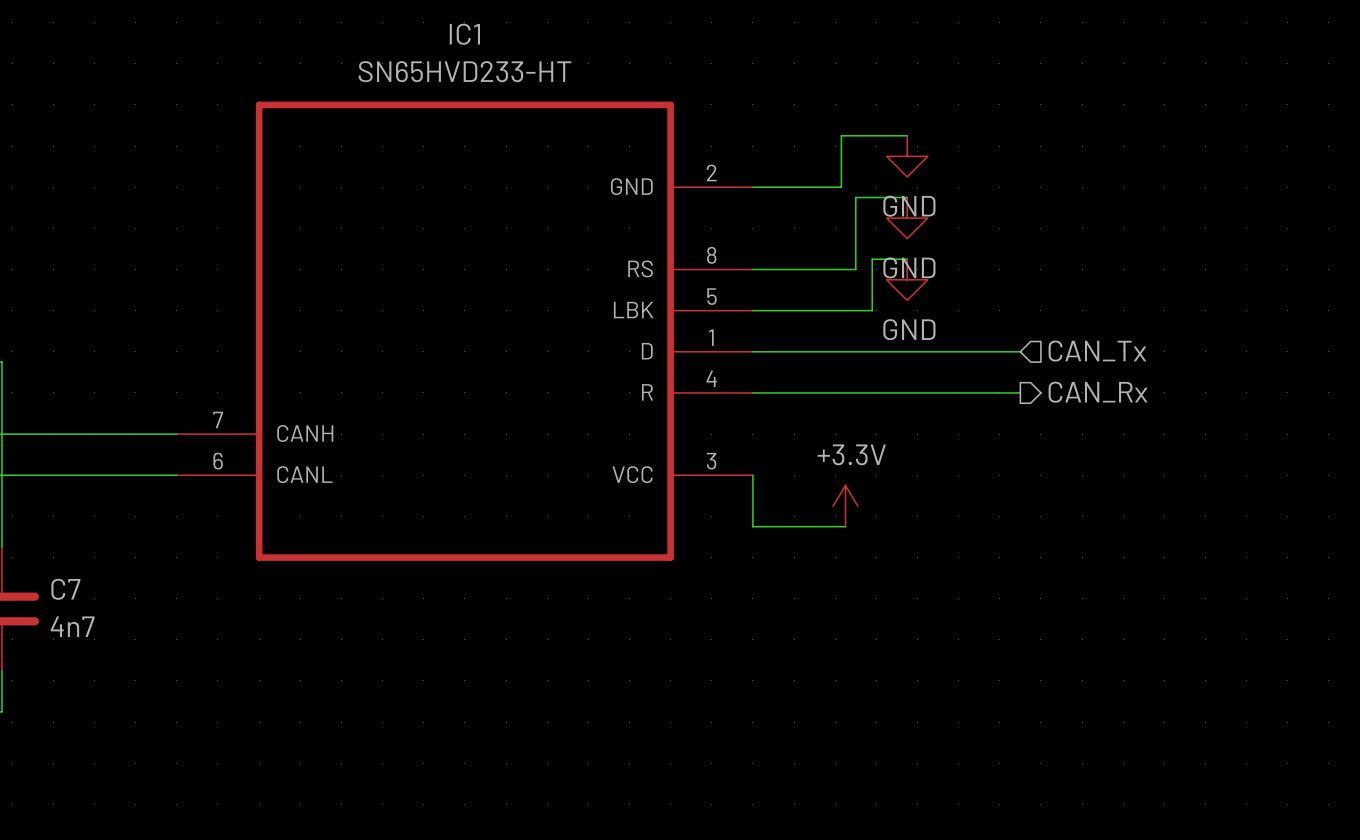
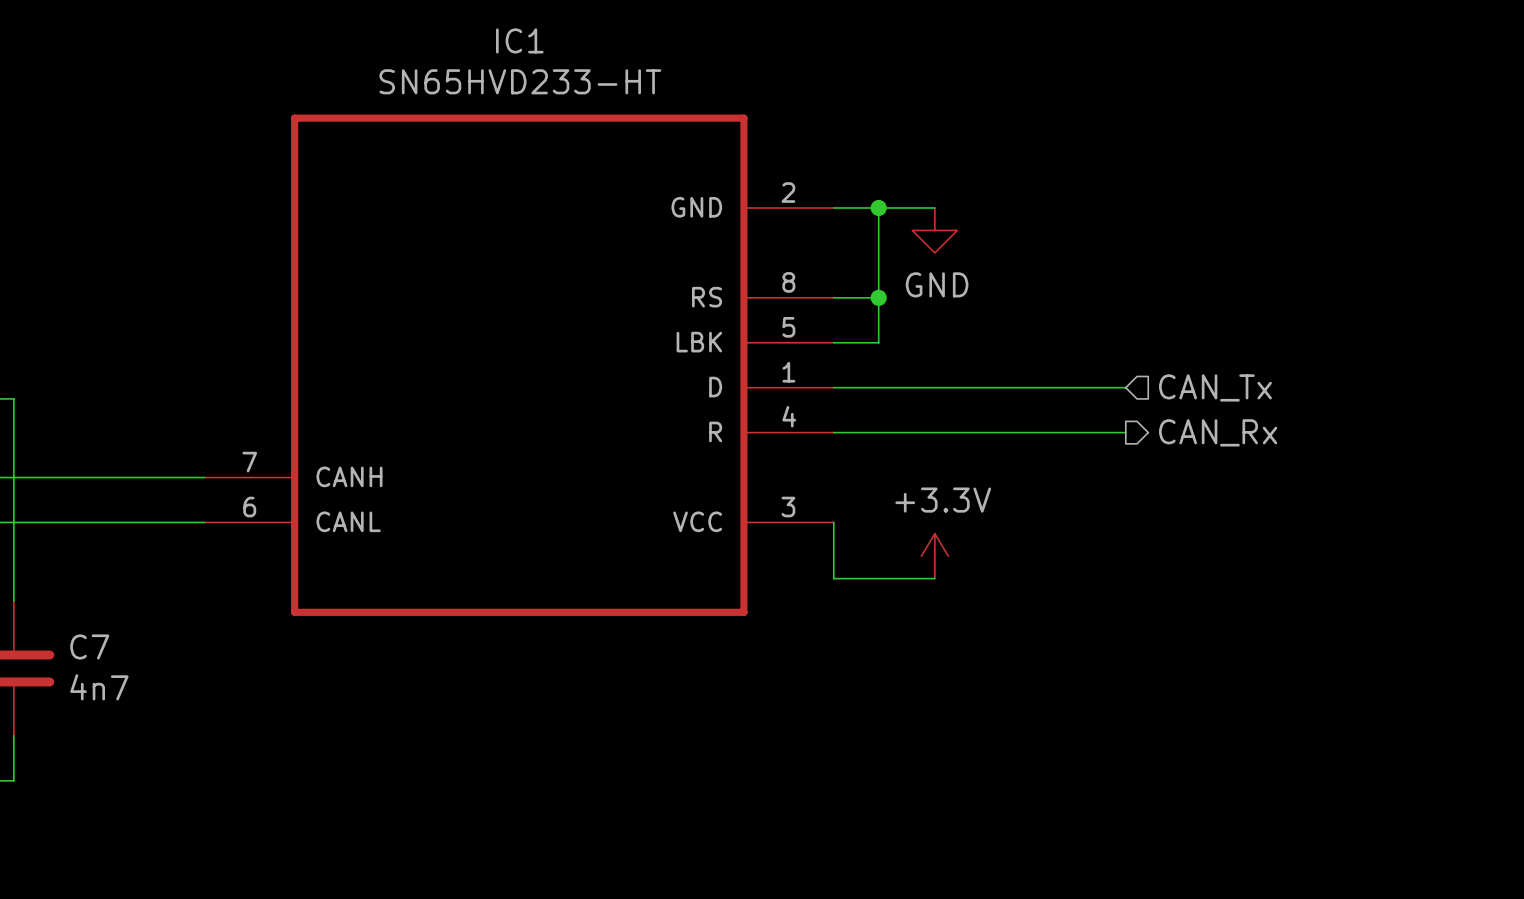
wire: (907, 135) (841, 135) (841, 187) -> (934, 207) (930, 207)
power symbol: GND (907, 156) -> none
junction: none -> (878, 207)
wire: (907, 197) (855, 197) (855, 269) (794, 269) -> none
power symbol: none -> GND (934, 230)
power symbol: GND (907, 218) -> none
wire: (907, 259) (872, 259) (872, 310) (794, 310) -> (878, 207) (878, 342)
junction: none -> (878, 297)
power symbol: GND (907, 279) -> none

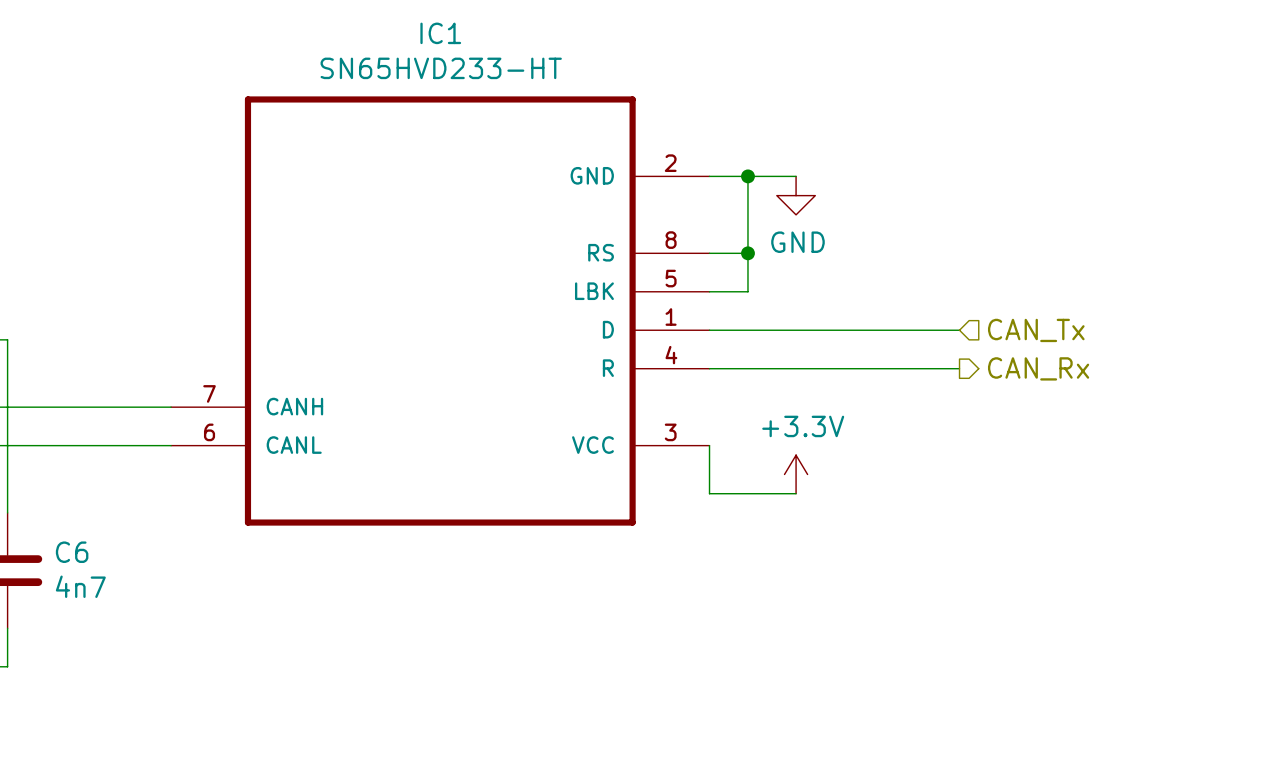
C7 name: C7 (89, 646) -> C6 (72, 552)

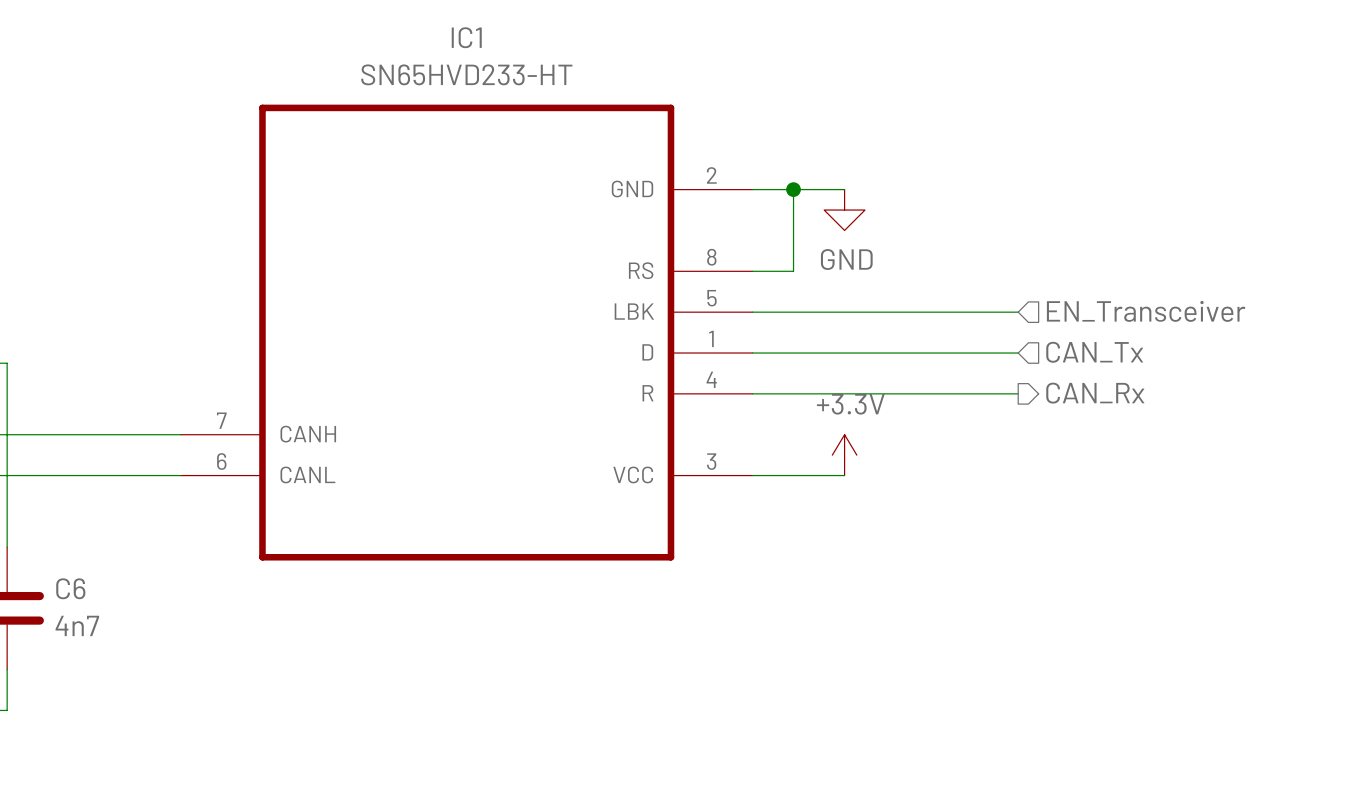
wire: (747, 253) (747, 291) -> (1018, 312) (793, 312)
junction: (747, 253) -> none
hierarchical label: none -> EN_Transceiver (1146, 311)
wire: (709, 445) (709, 493) (796, 493) -> (752, 475) (844, 475)
power symbol position: +3.3V (796, 474) -> +3.3V (844, 455)

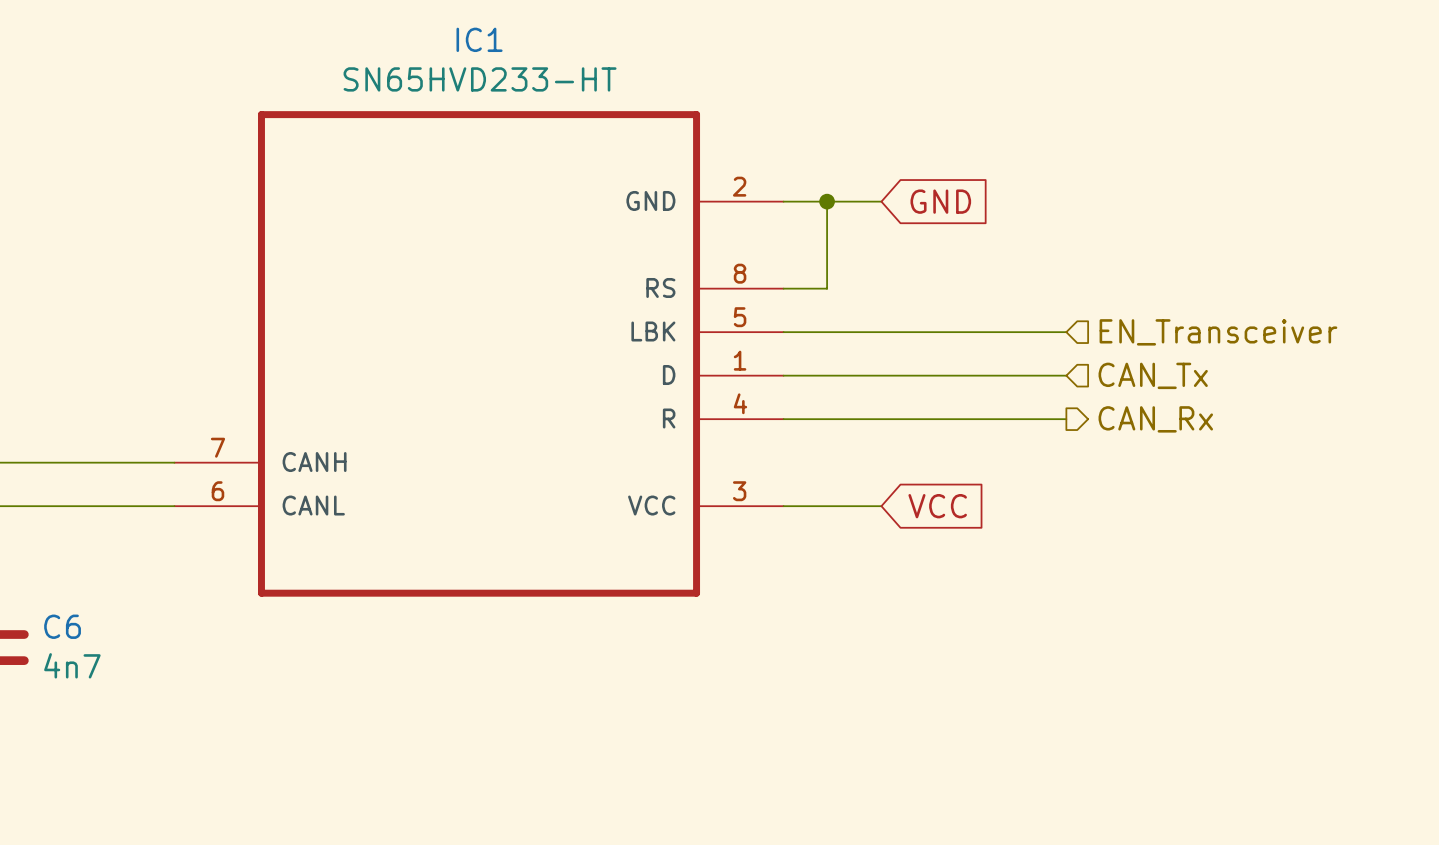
global label: none -> GND (940, 201)
power symbol: GND (844, 210) -> none
power symbol: +3.3V (844, 455) -> none
global label: none -> VCC (937, 506)

